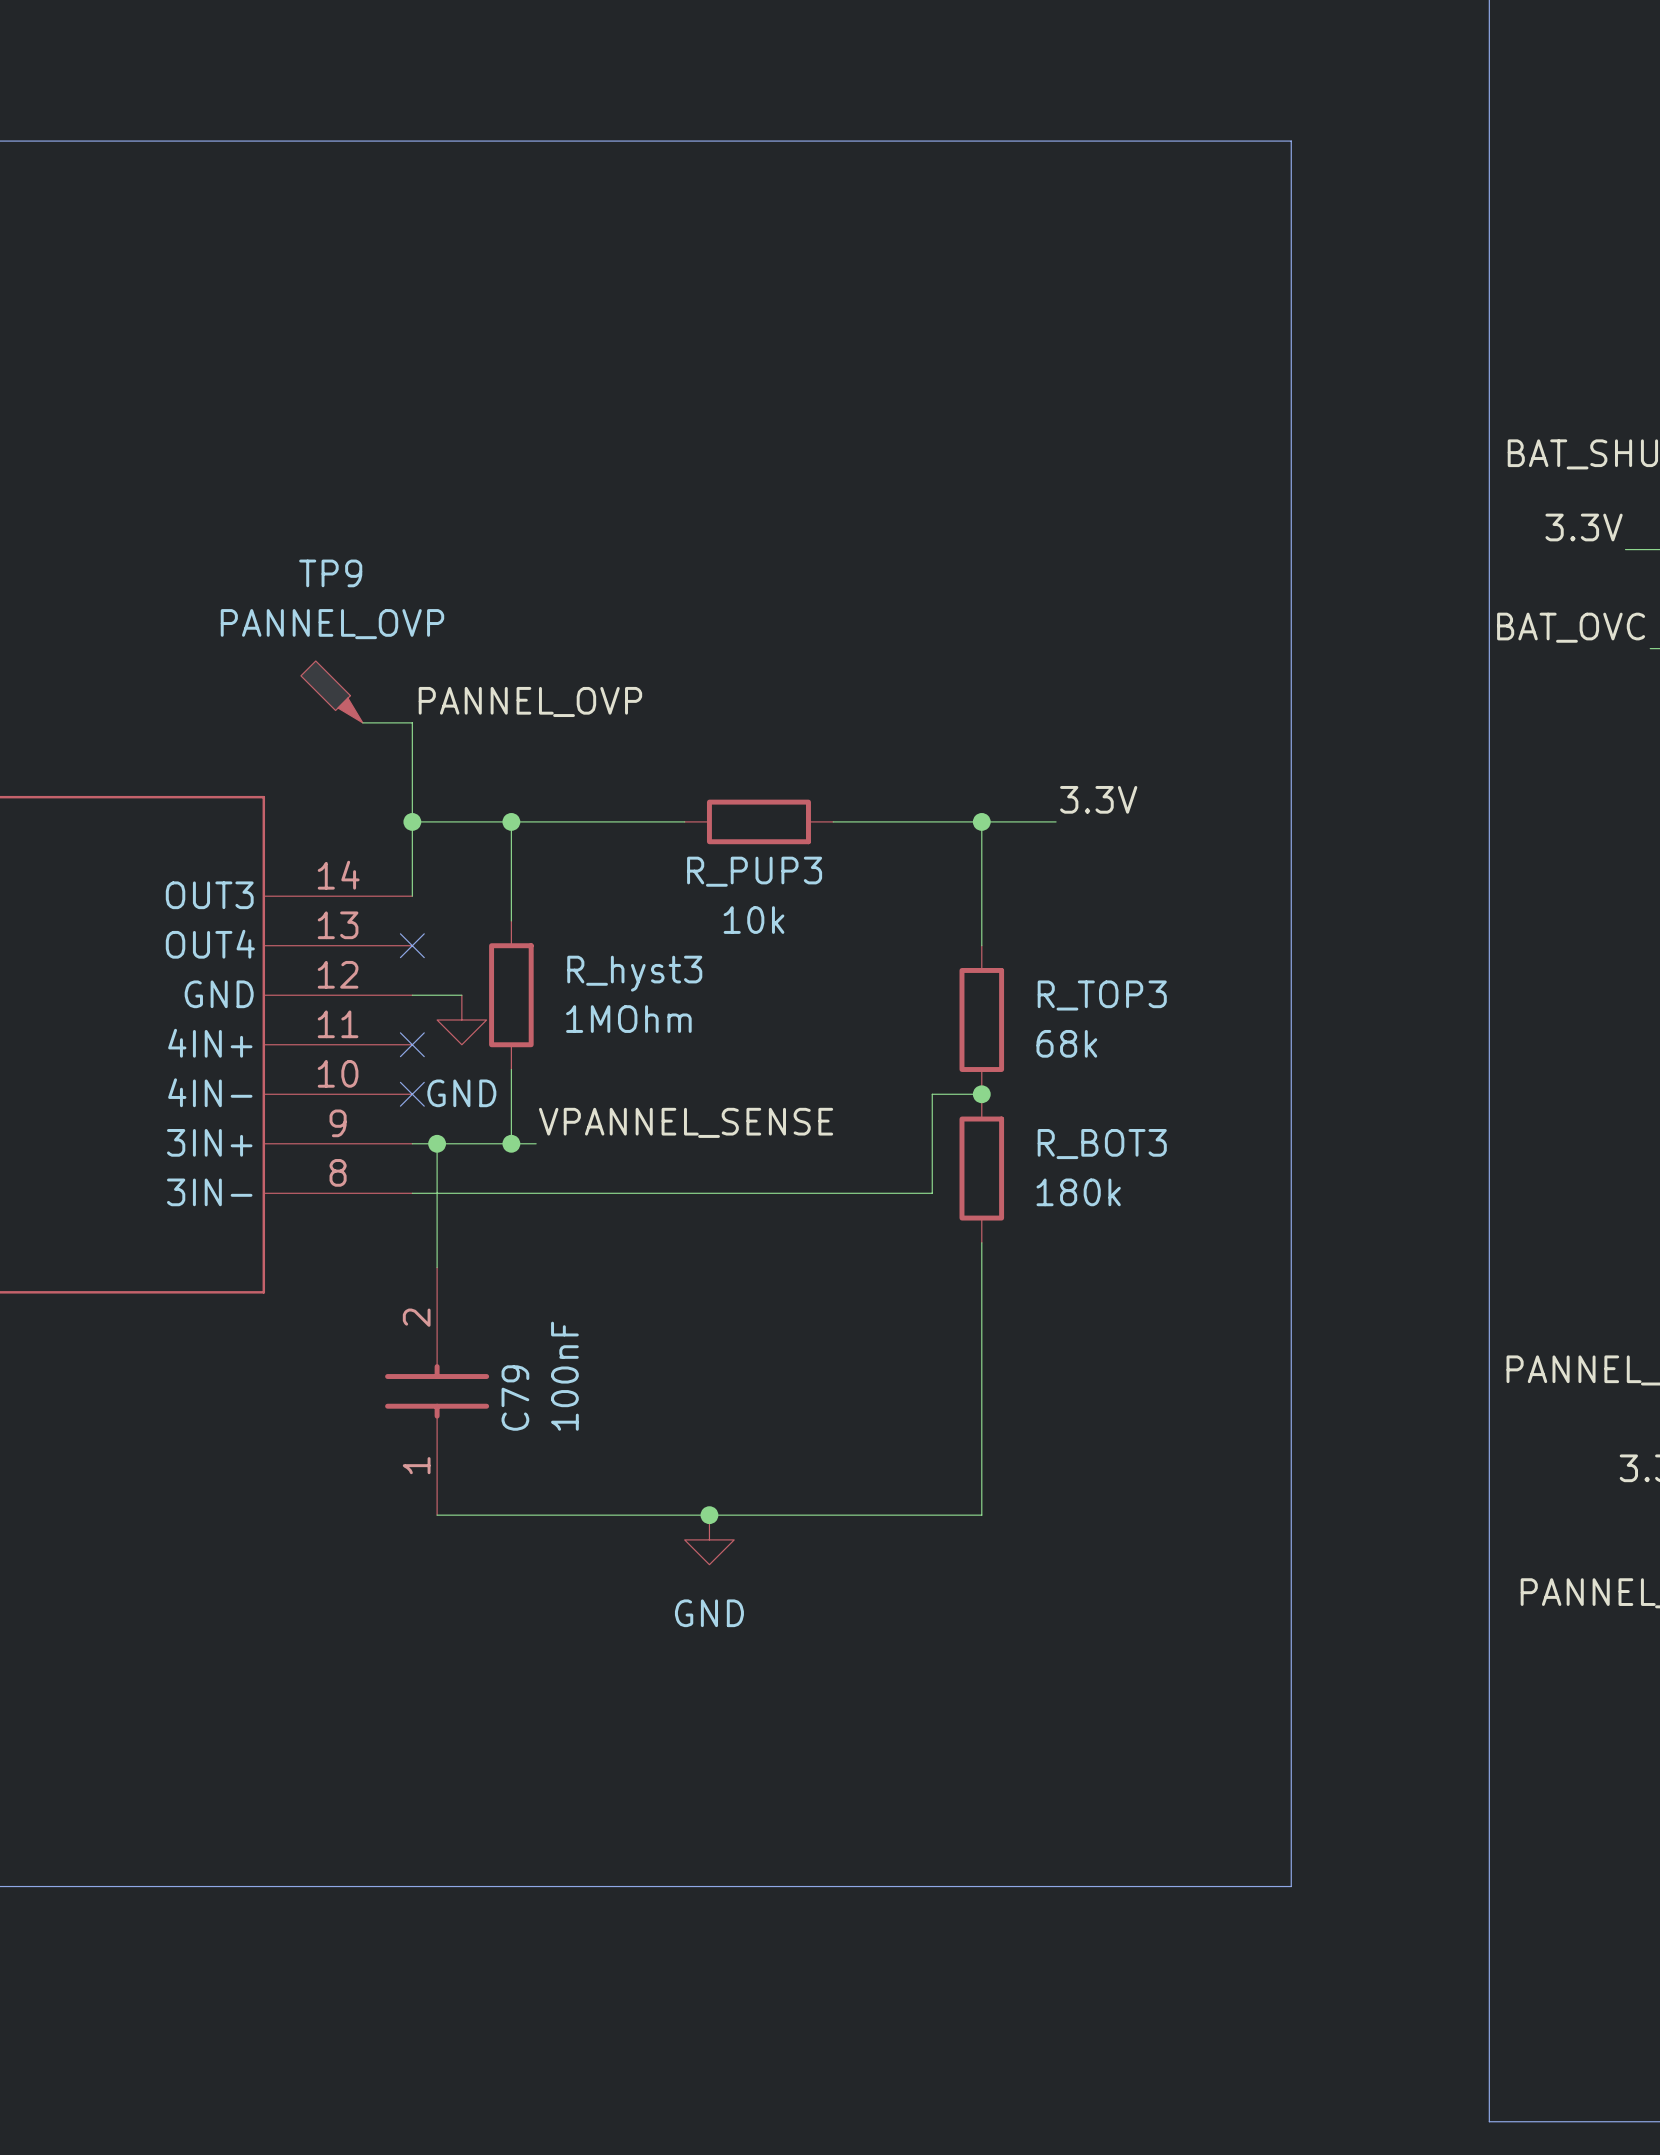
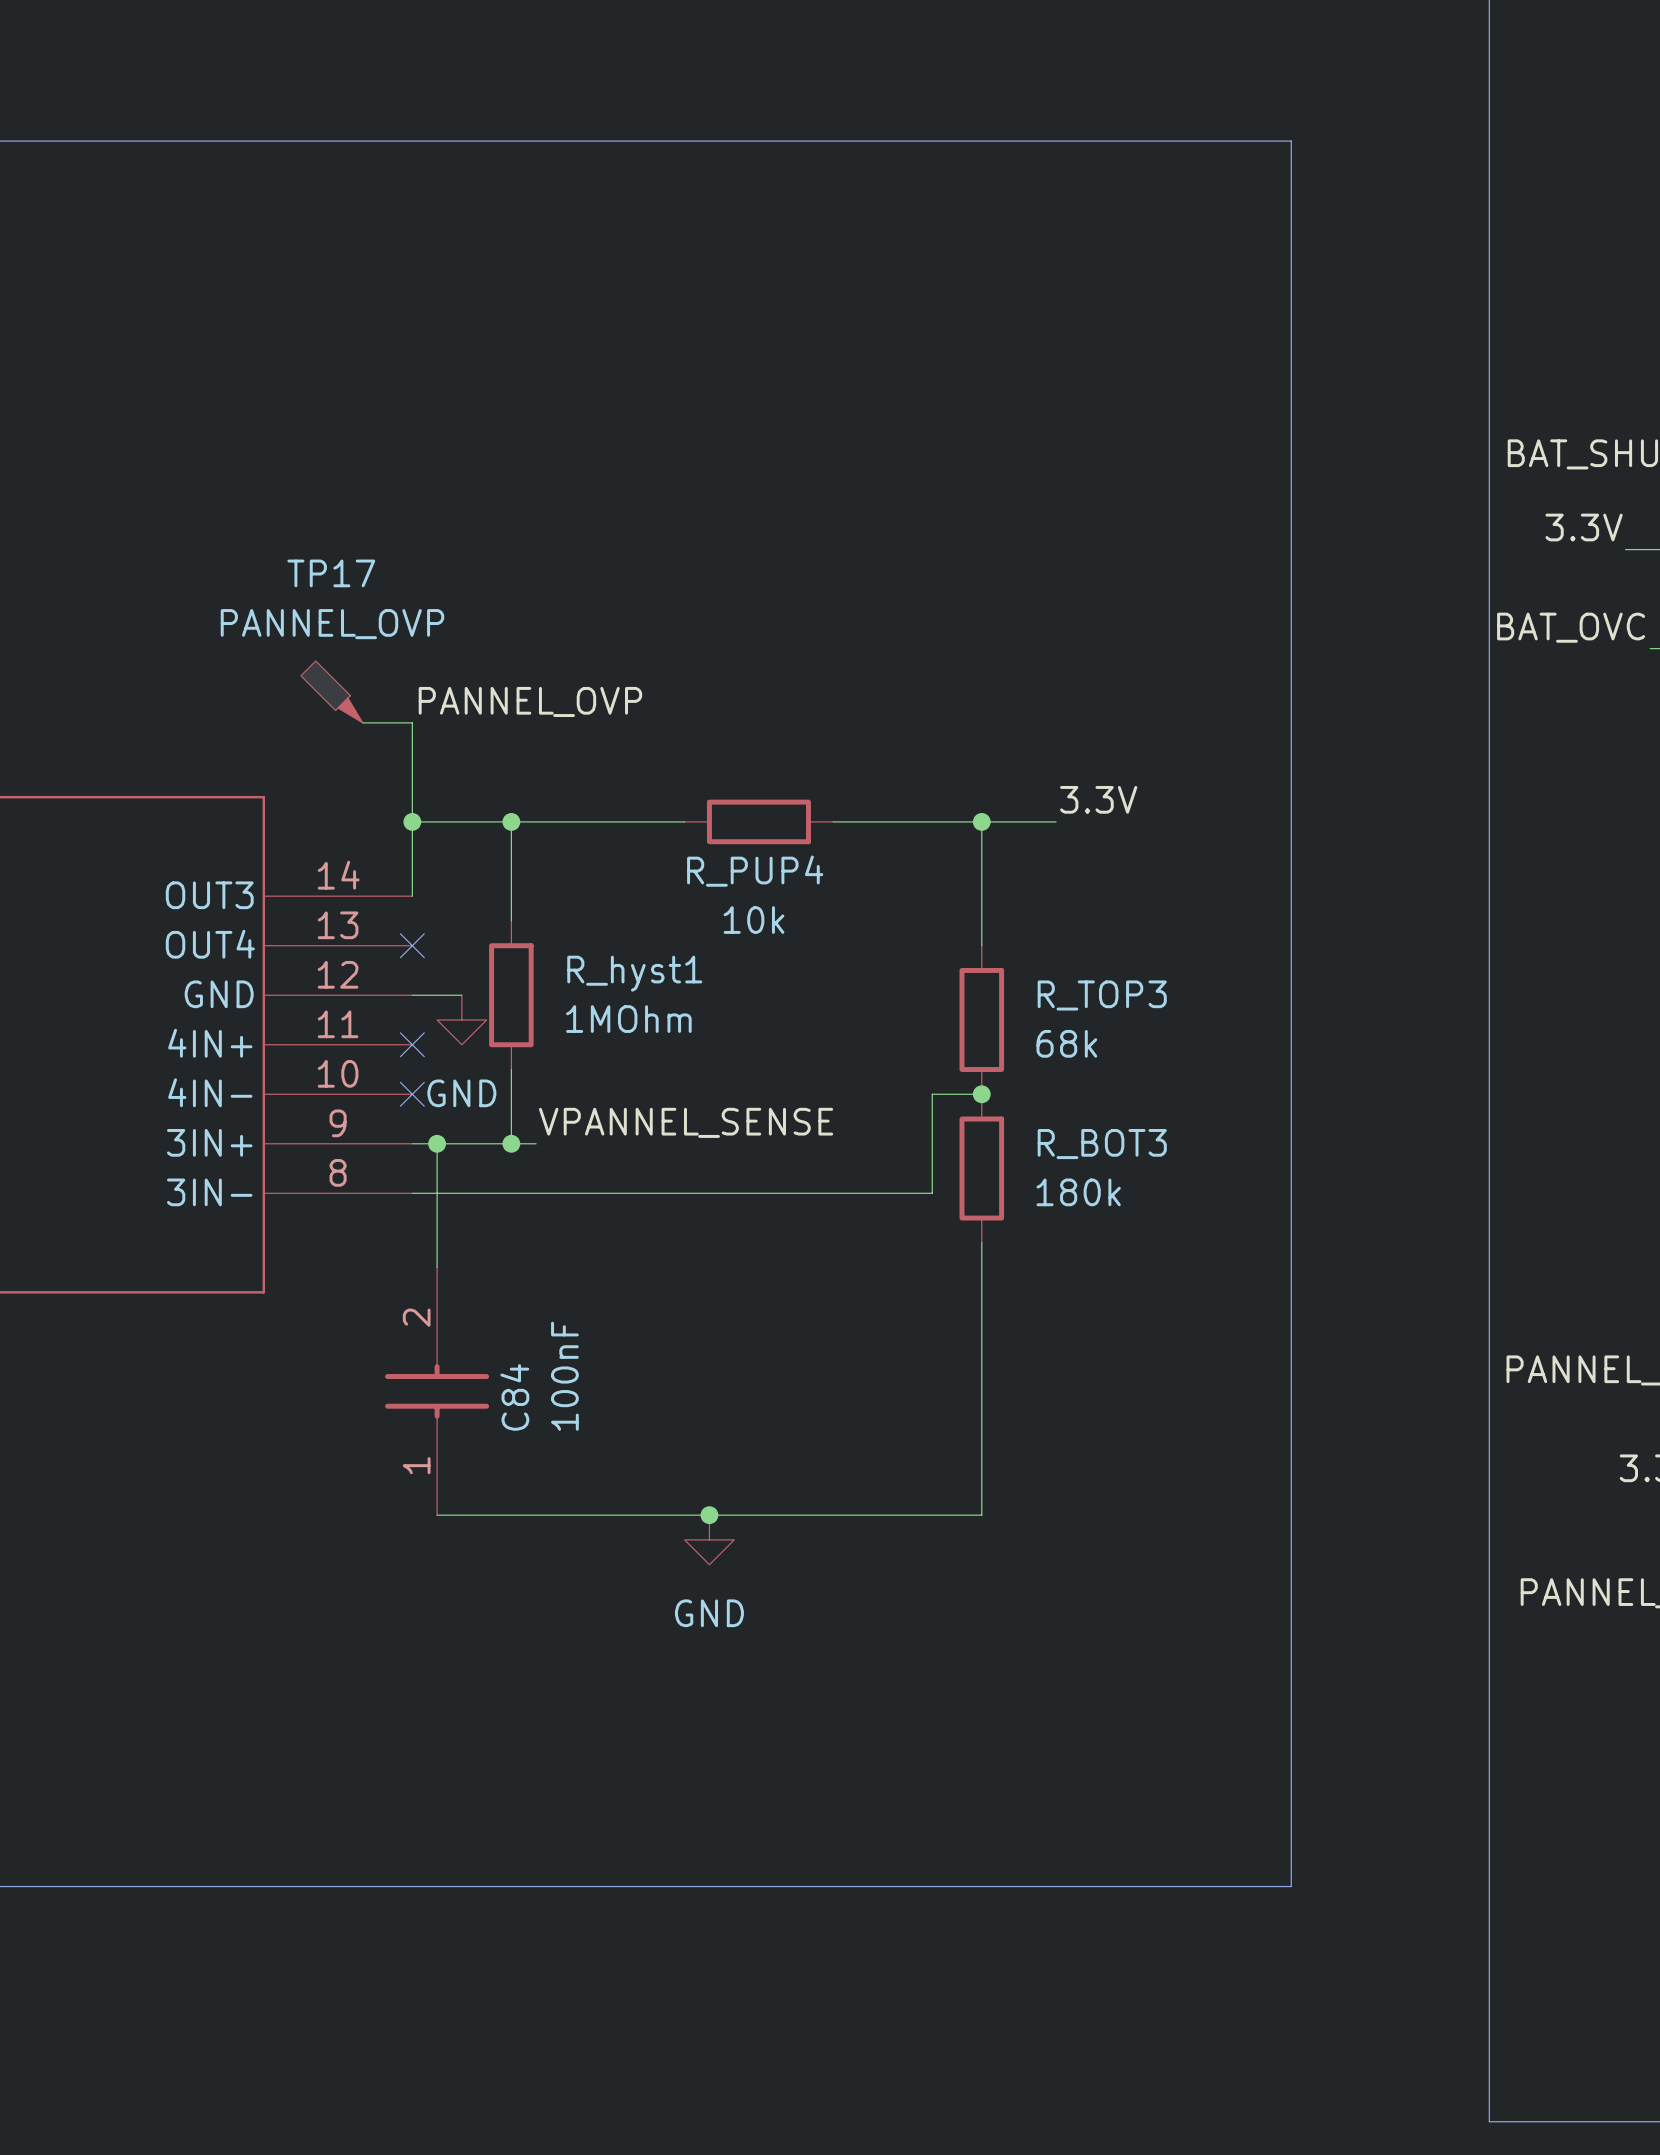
TP9 name: TP9 (330, 573) -> TP17 (331, 573)
R_PUP3 name: R_PUP3 (754, 871) -> R_PUP4 (755, 871)
R_hyst3 name: R_hyst3 (634, 973) -> R_hyst1 (634, 973)
C79 name: C79 (515, 1398) -> C84 (514, 1397)

